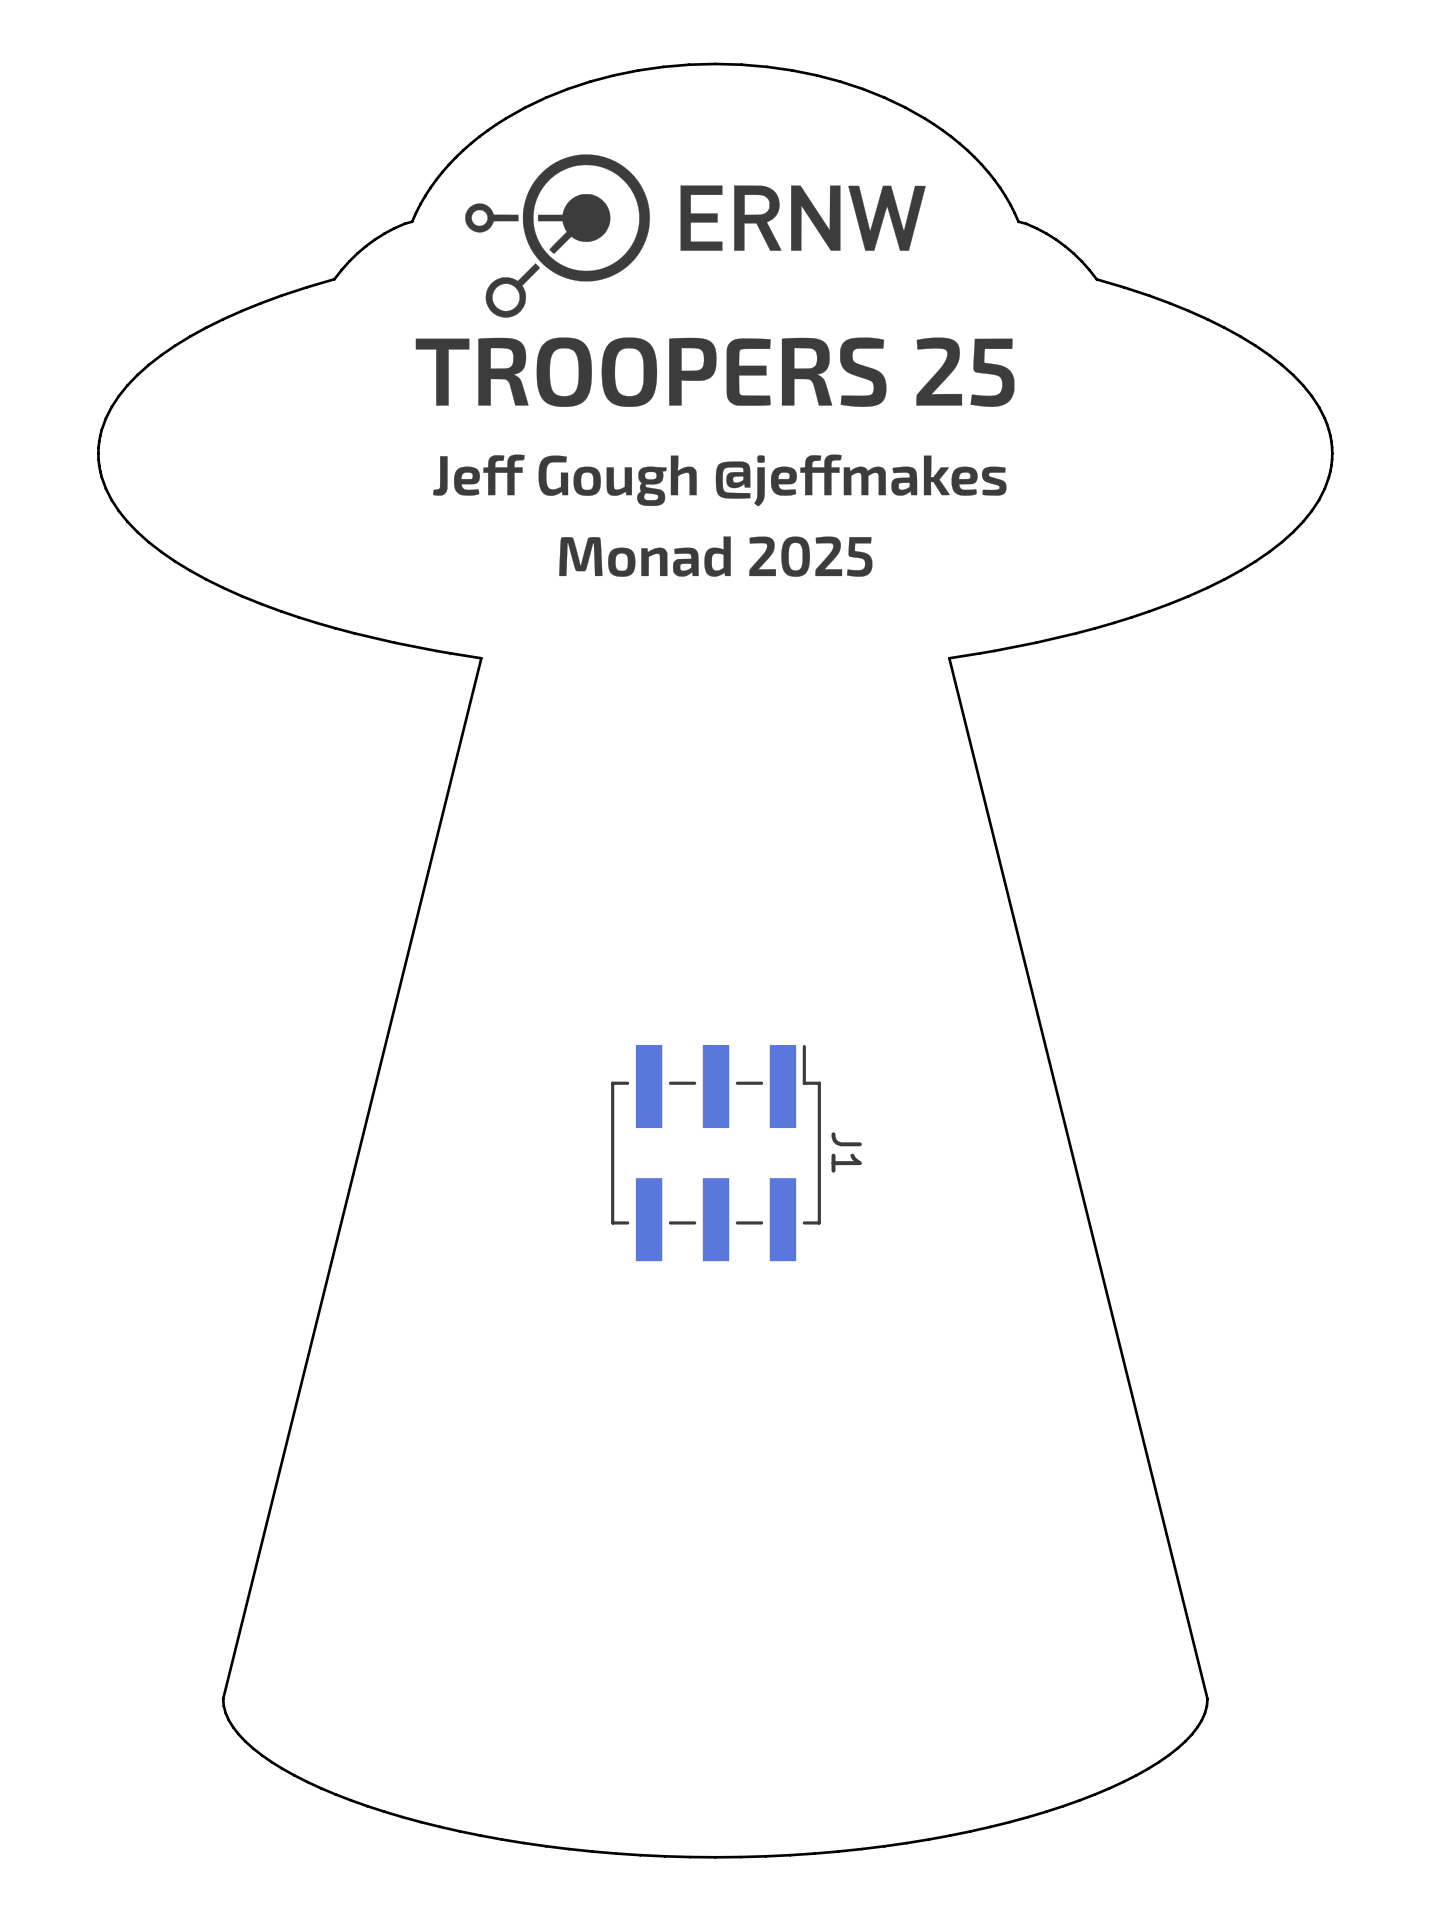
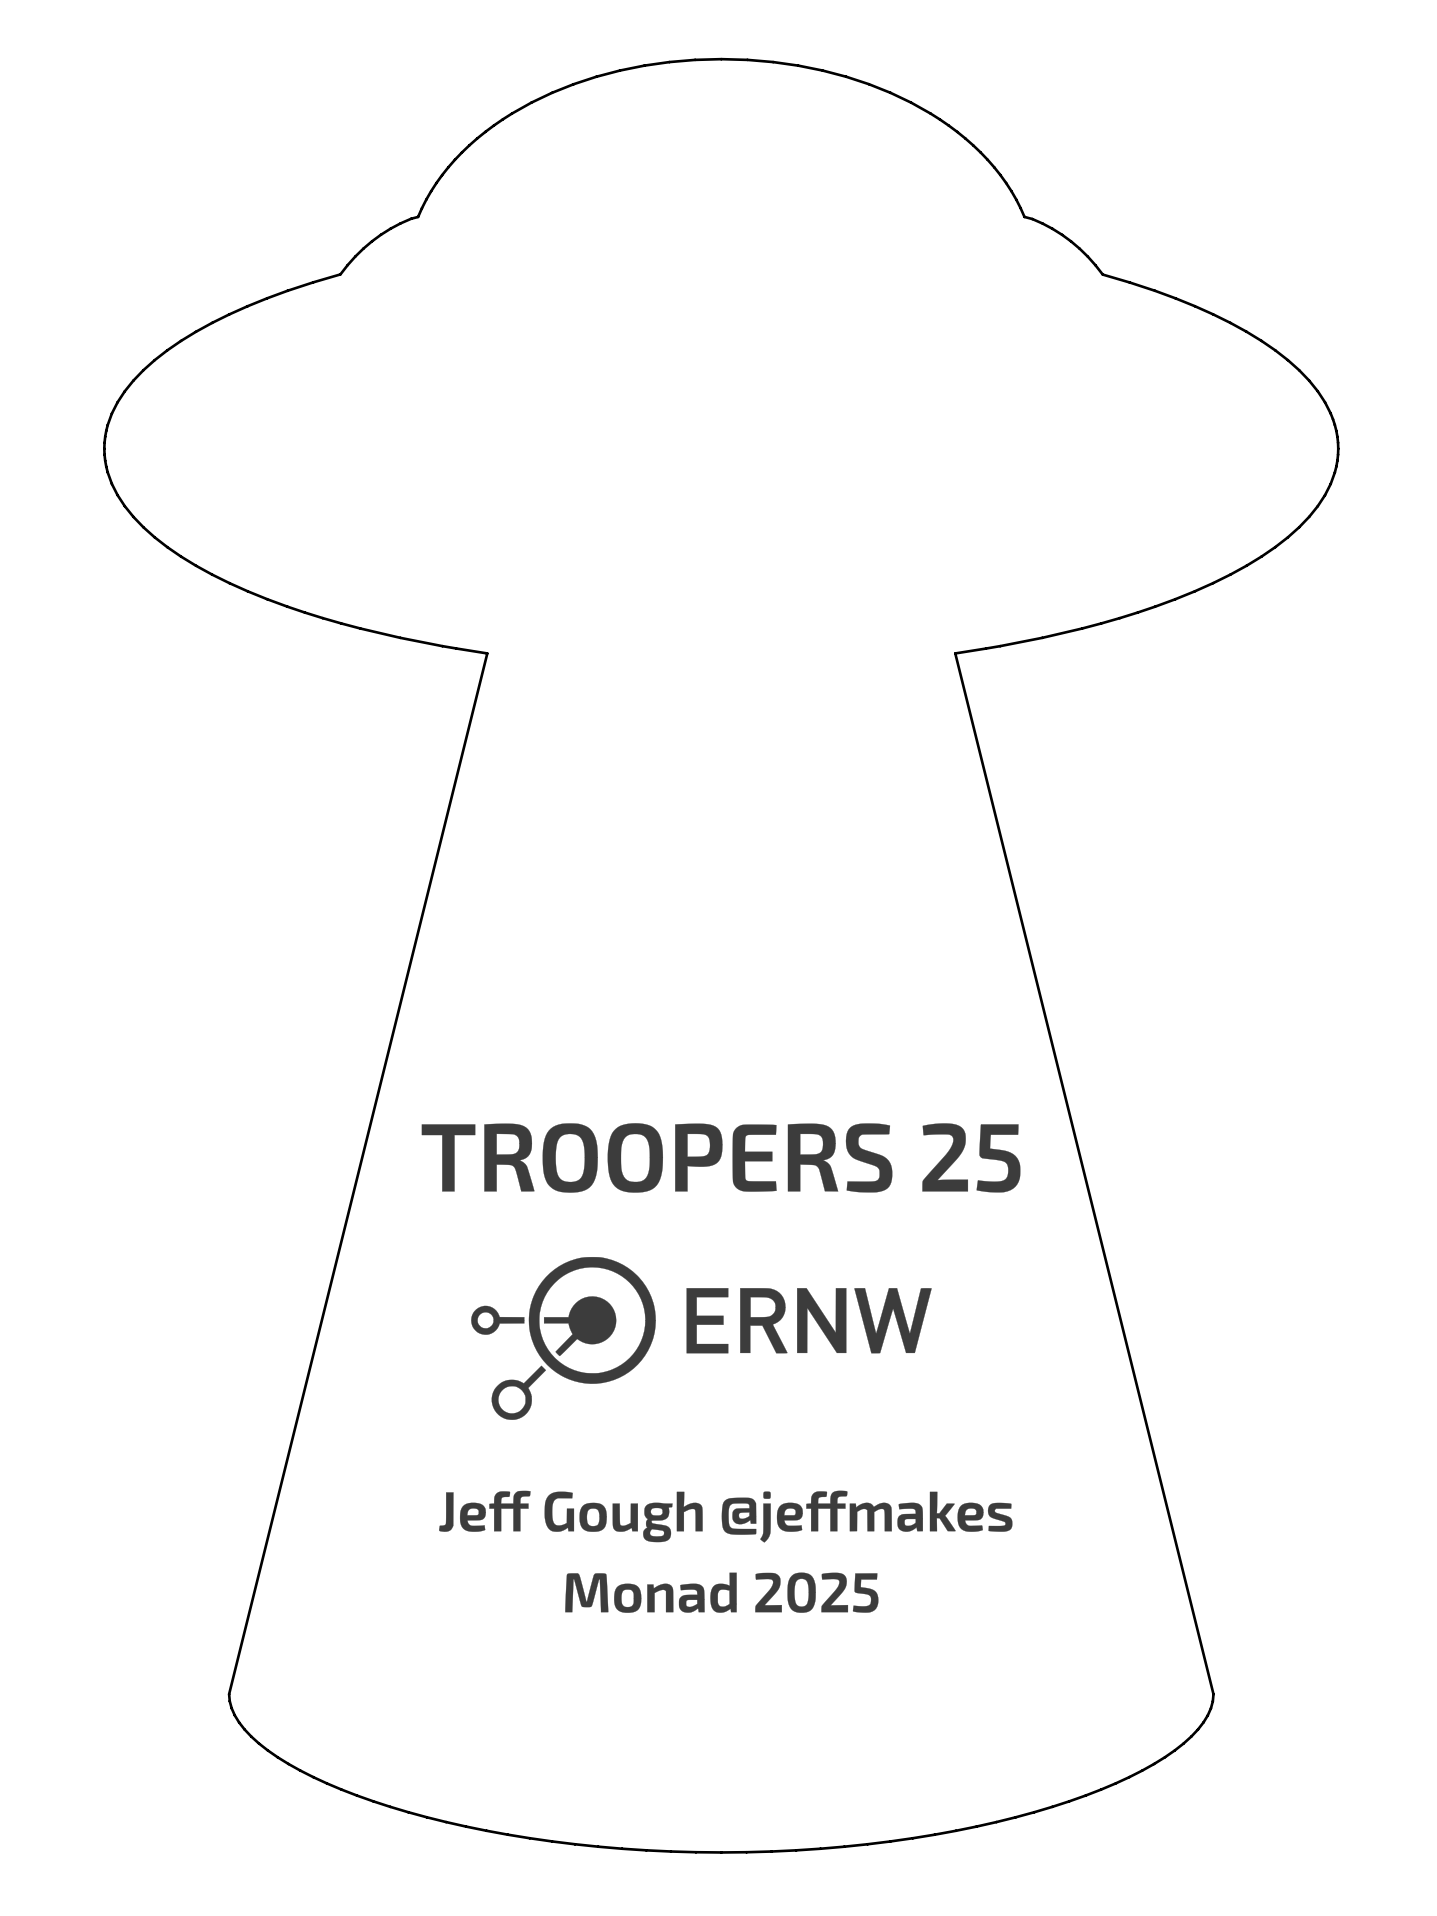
drawing shape: [97, 62, 1334, 1859] -> [103, 57, 1340, 1854]
J1: (716, 1153) -> none

